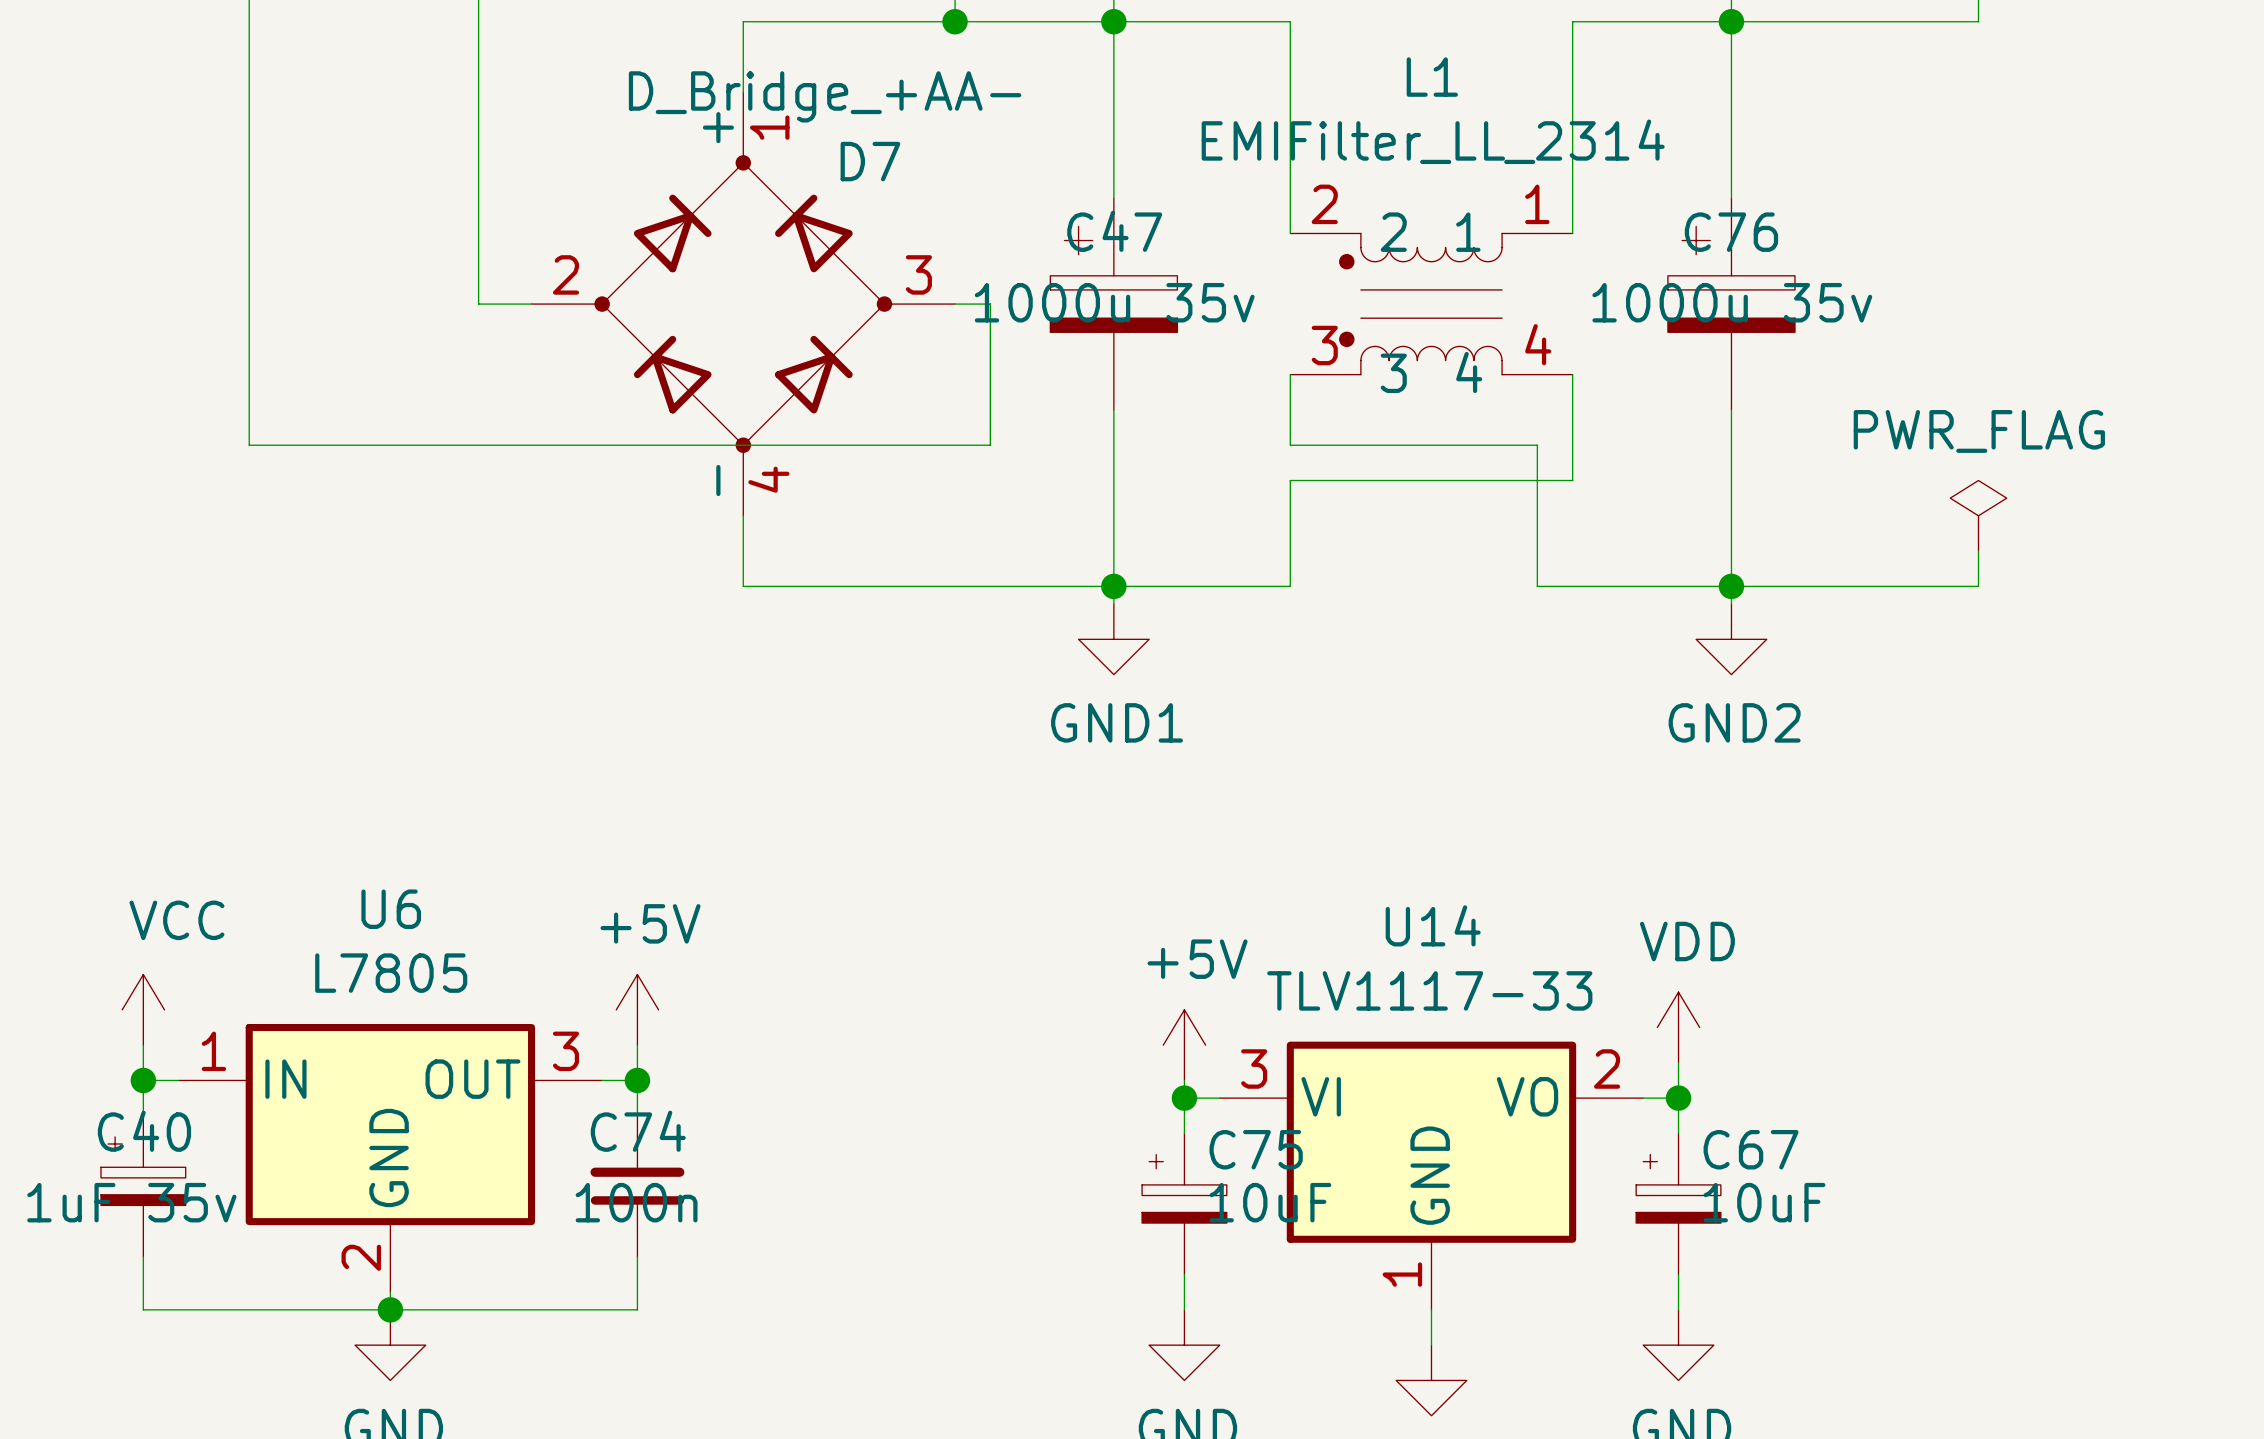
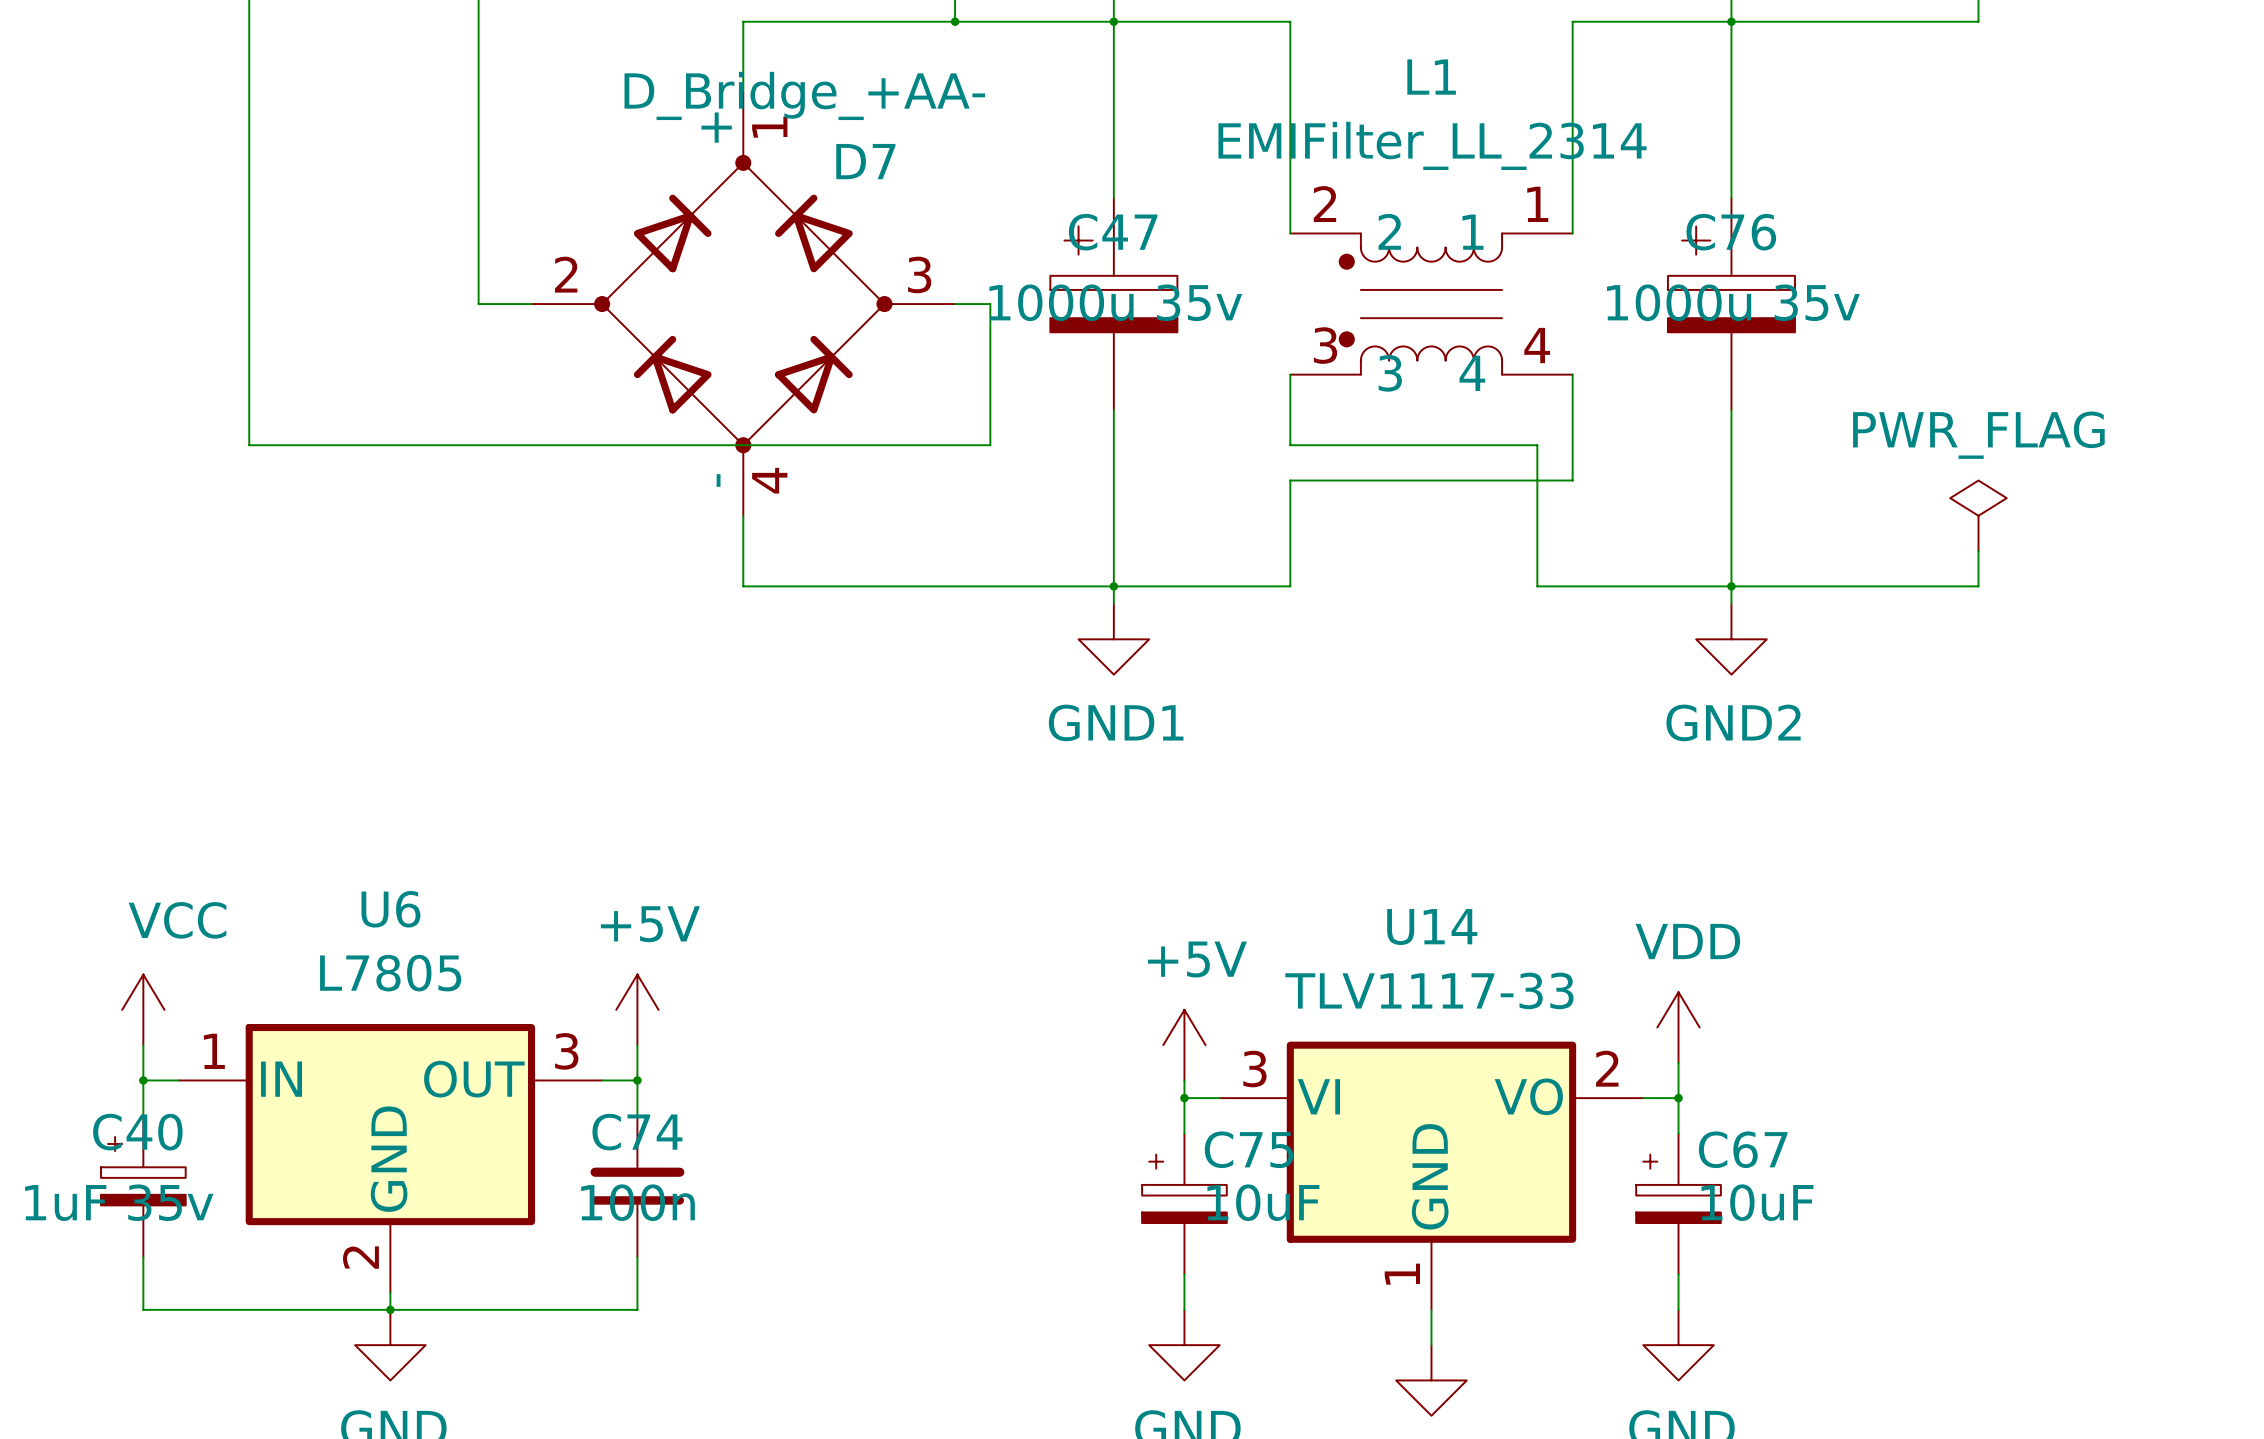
junction size: [942, 9, 968, 35] -> [950, 17, 960, 26]
junction size: [1101, 9, 1127, 35] -> [1109, 17, 1119, 26]
junction size: [1718, 9, 1745, 35] -> [1727, 17, 1736, 26]
junction size: [1101, 573, 1127, 600] -> [1109, 582, 1119, 591]
junction size: [1718, 573, 1745, 600] -> [1727, 582, 1736, 591]
junction size: [130, 1067, 157, 1094] -> [139, 1076, 148, 1085]
junction size: [624, 1067, 651, 1094] -> [633, 1076, 642, 1085]
junction size: [1171, 1085, 1198, 1111] -> [1180, 1093, 1189, 1103]
junction size: [1665, 1085, 1692, 1111] -> [1674, 1093, 1683, 1103]
junction size: [377, 1297, 404, 1323] -> [386, 1305, 395, 1315]

